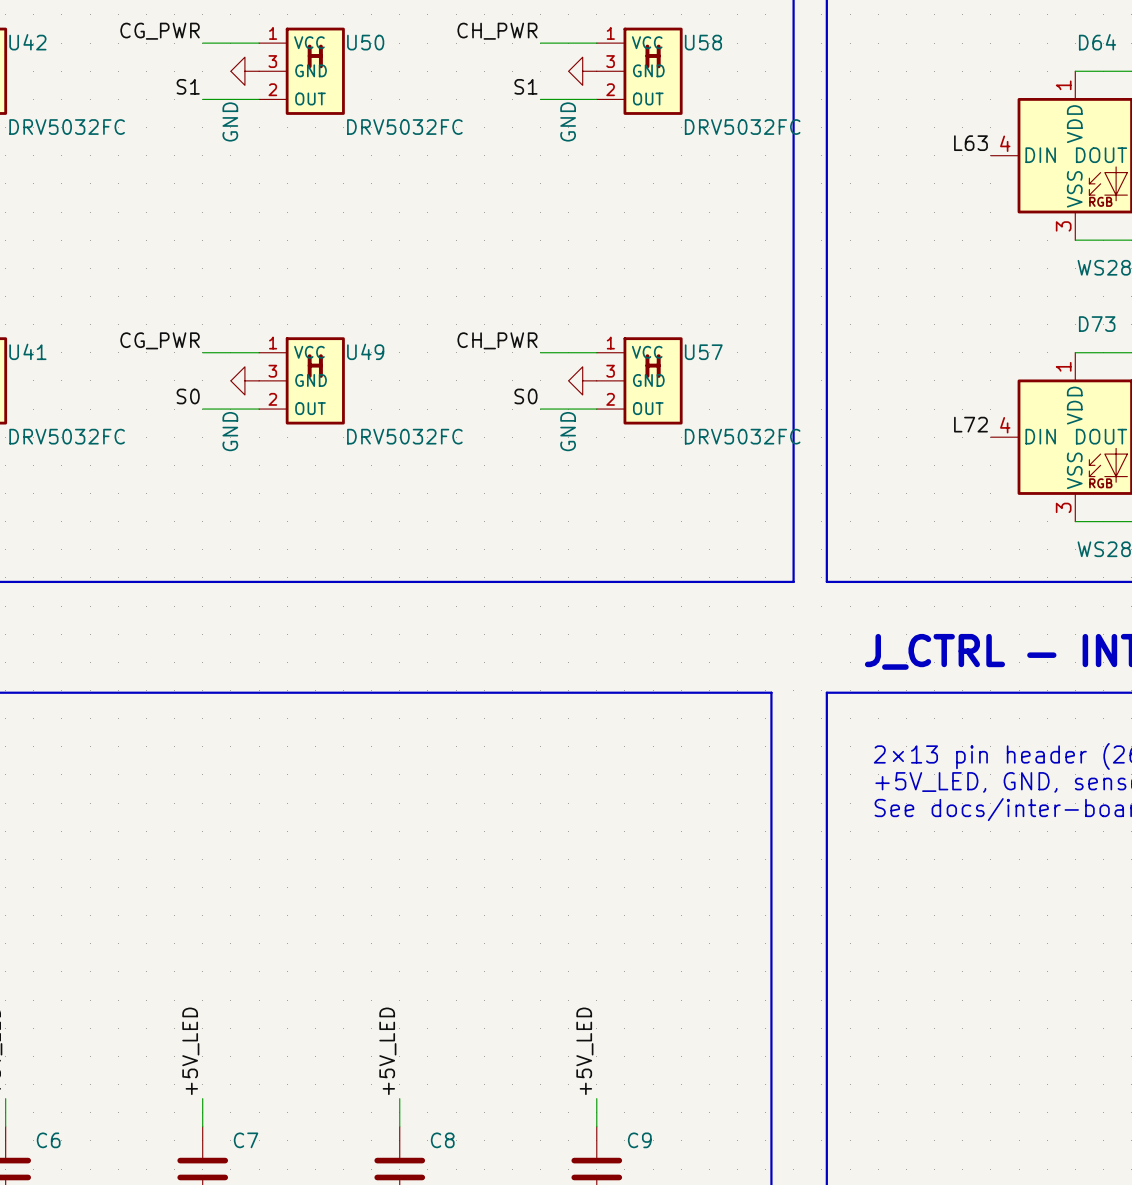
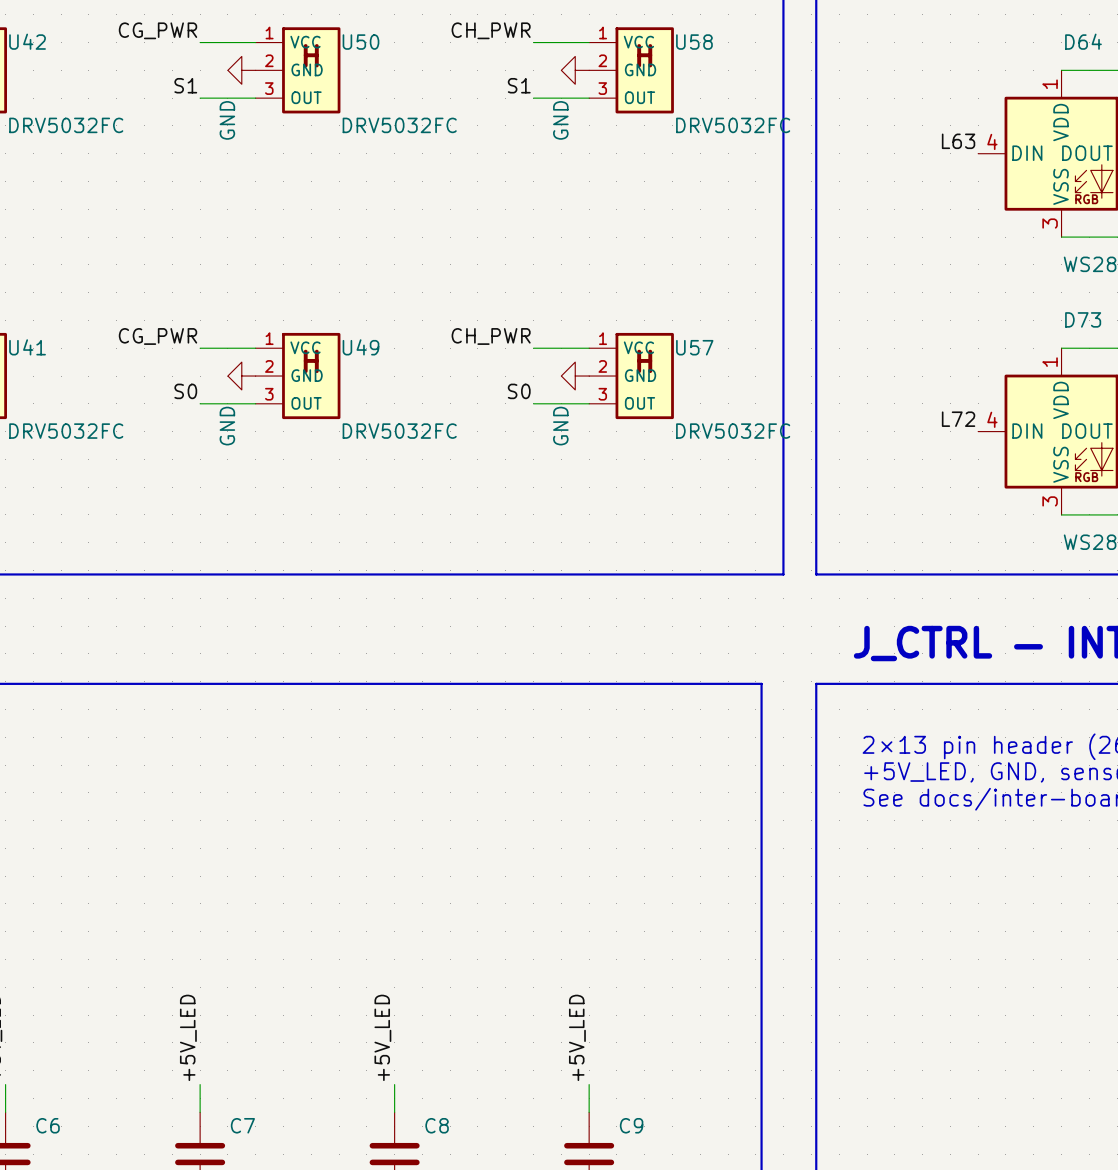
U50 pin number: 3 (272, 61) -> 2 (269, 60)
U58 pin number: 3 (610, 61) -> 2 (602, 60)
U50 pin number: 2 (272, 89) -> 3 (269, 88)
U58 pin number: 2 (610, 89) -> 3 (602, 88)
U49 pin number: 3 (272, 371) -> 2 (269, 366)
U57 pin number: 3 (610, 371) -> 2 (602, 366)
U49 pin number: 2 (272, 399) -> 3 (269, 394)
U57 pin number: 2 (610, 399) -> 3 (602, 394)

